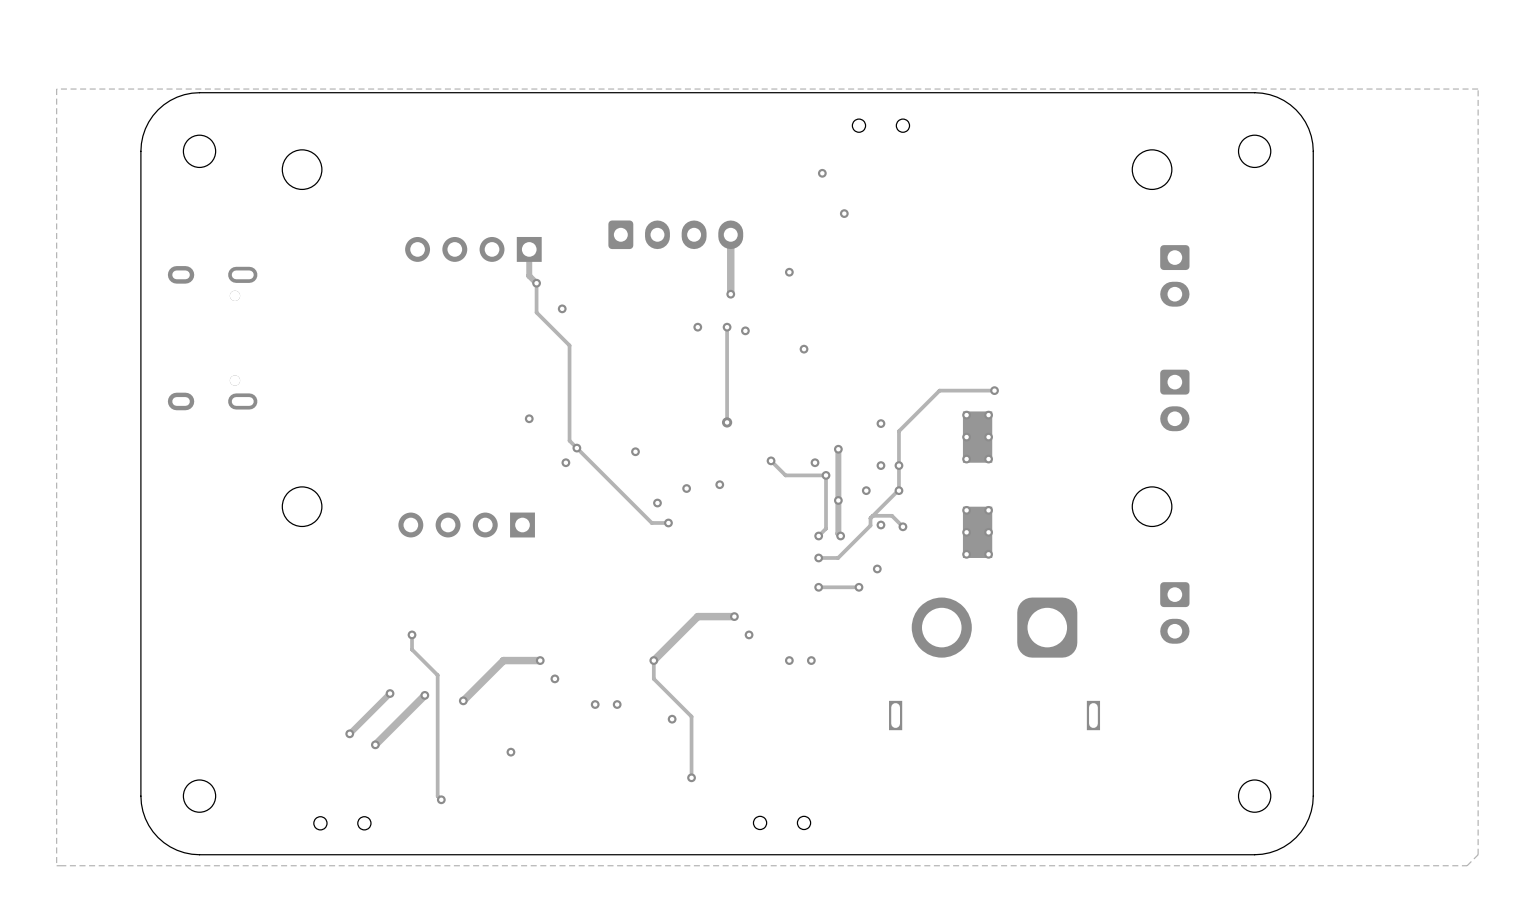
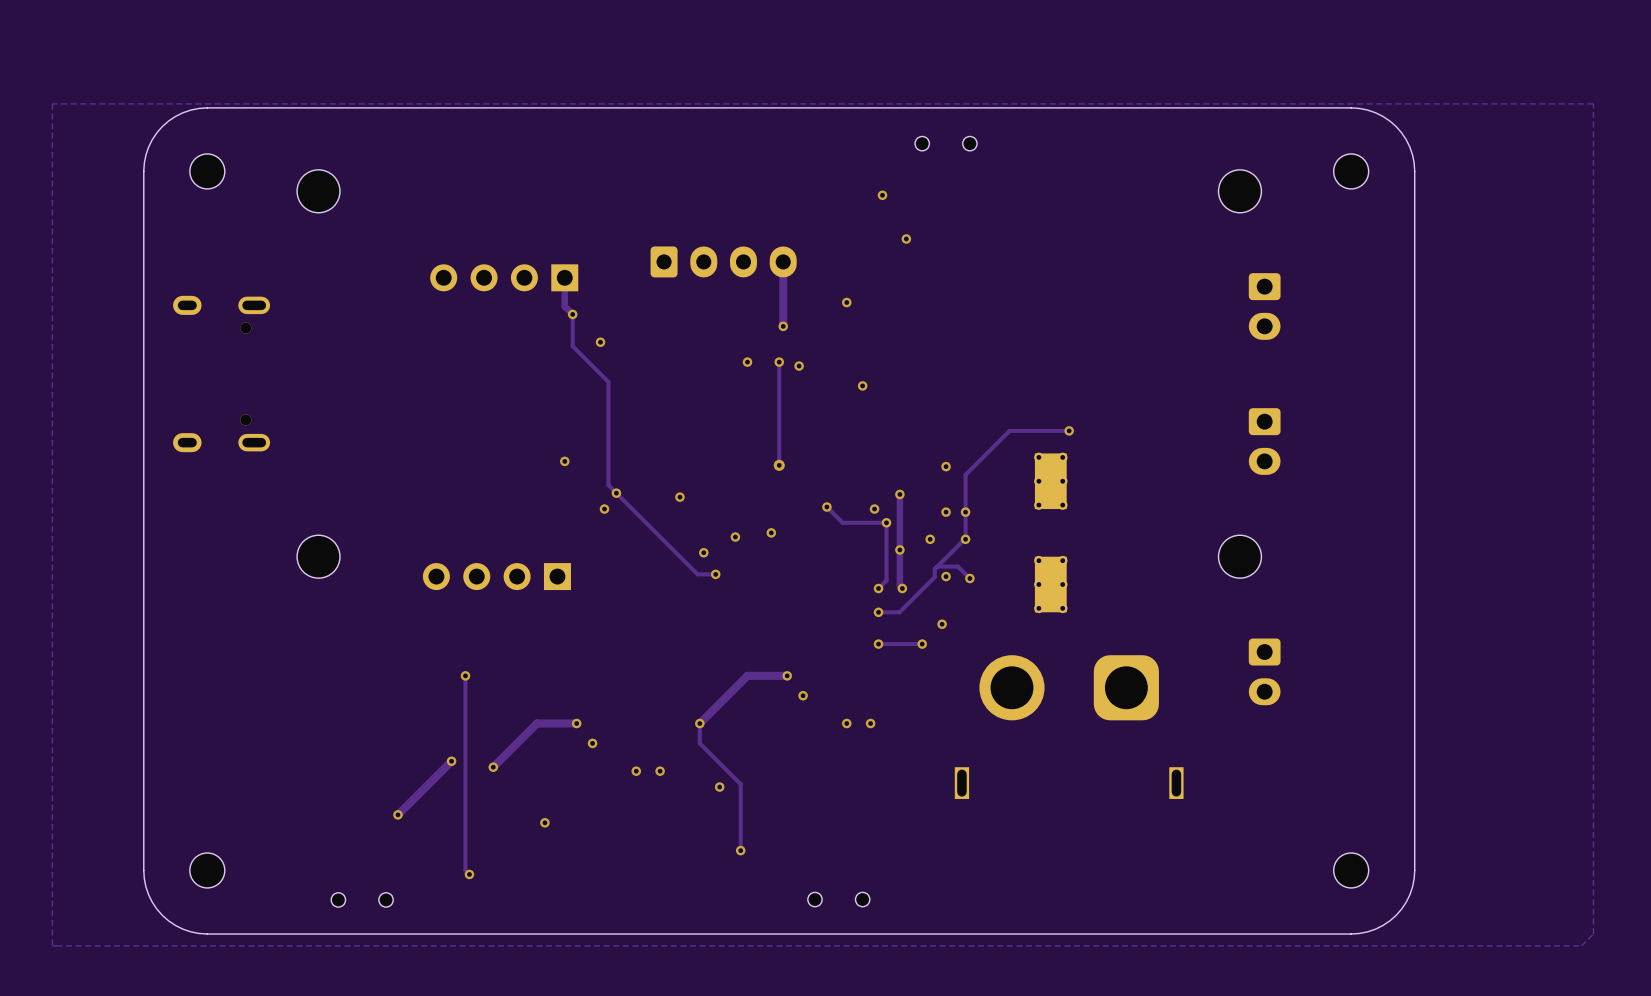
track: (412, 634) (412, 649) (437, 675) -> (465, 675) (465, 739)
via position: (412, 634) -> (465, 675)
track: (390, 693) (349, 733) -> none
via: (390, 693) -> none
via: (349, 733) -> none

